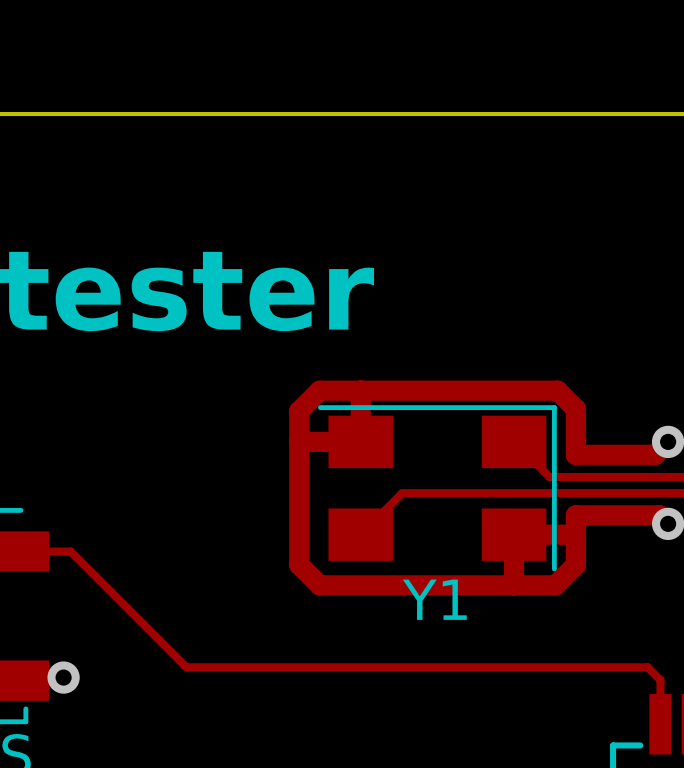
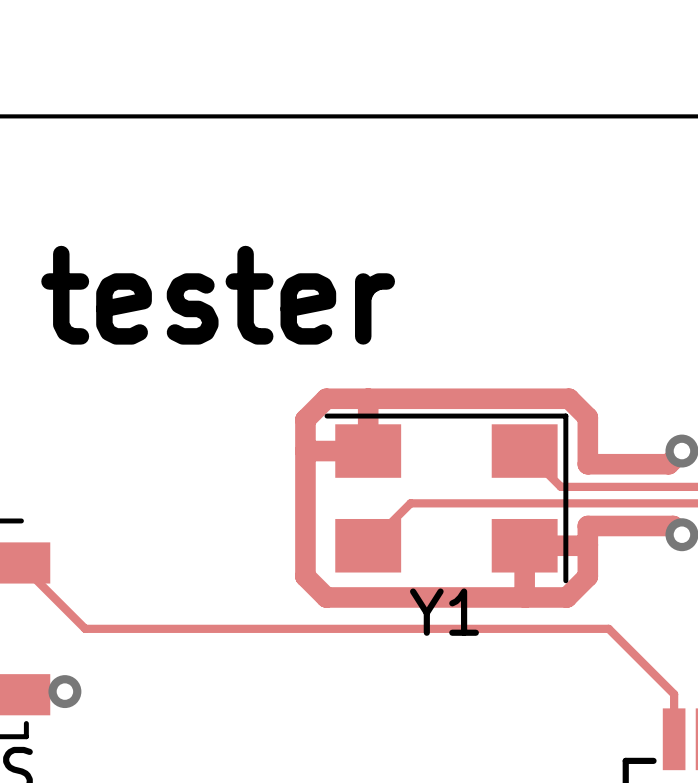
track: (18, 551) (70, 551) (186, 667) (647, 667) -> (19, 562) (85, 628) (608, 628) (661, 681)

